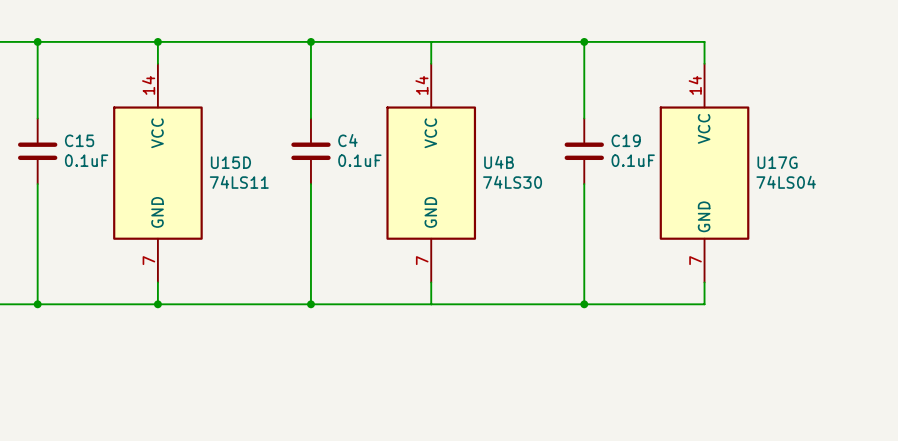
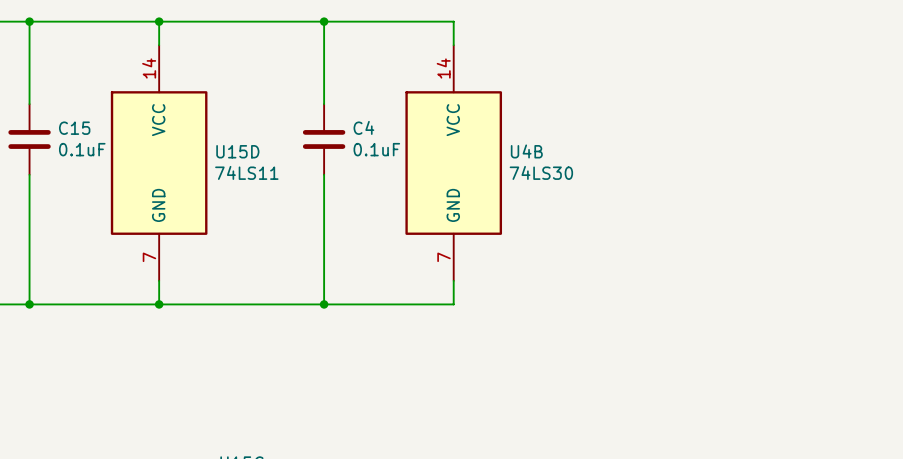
wire: (431, 41) (704, 41) (704, 63) -> none
wire: (584, 41) (584, 118) -> none
junction: (584, 41) -> none
C19: 0.1uF (584, 151) -> none
U17G: 74LS04 (704, 173) -> none
wire: (584, 184) (584, 304) -> none
wire: (704, 282) (704, 304) (431, 304) -> none
junction: (584, 304) -> none

